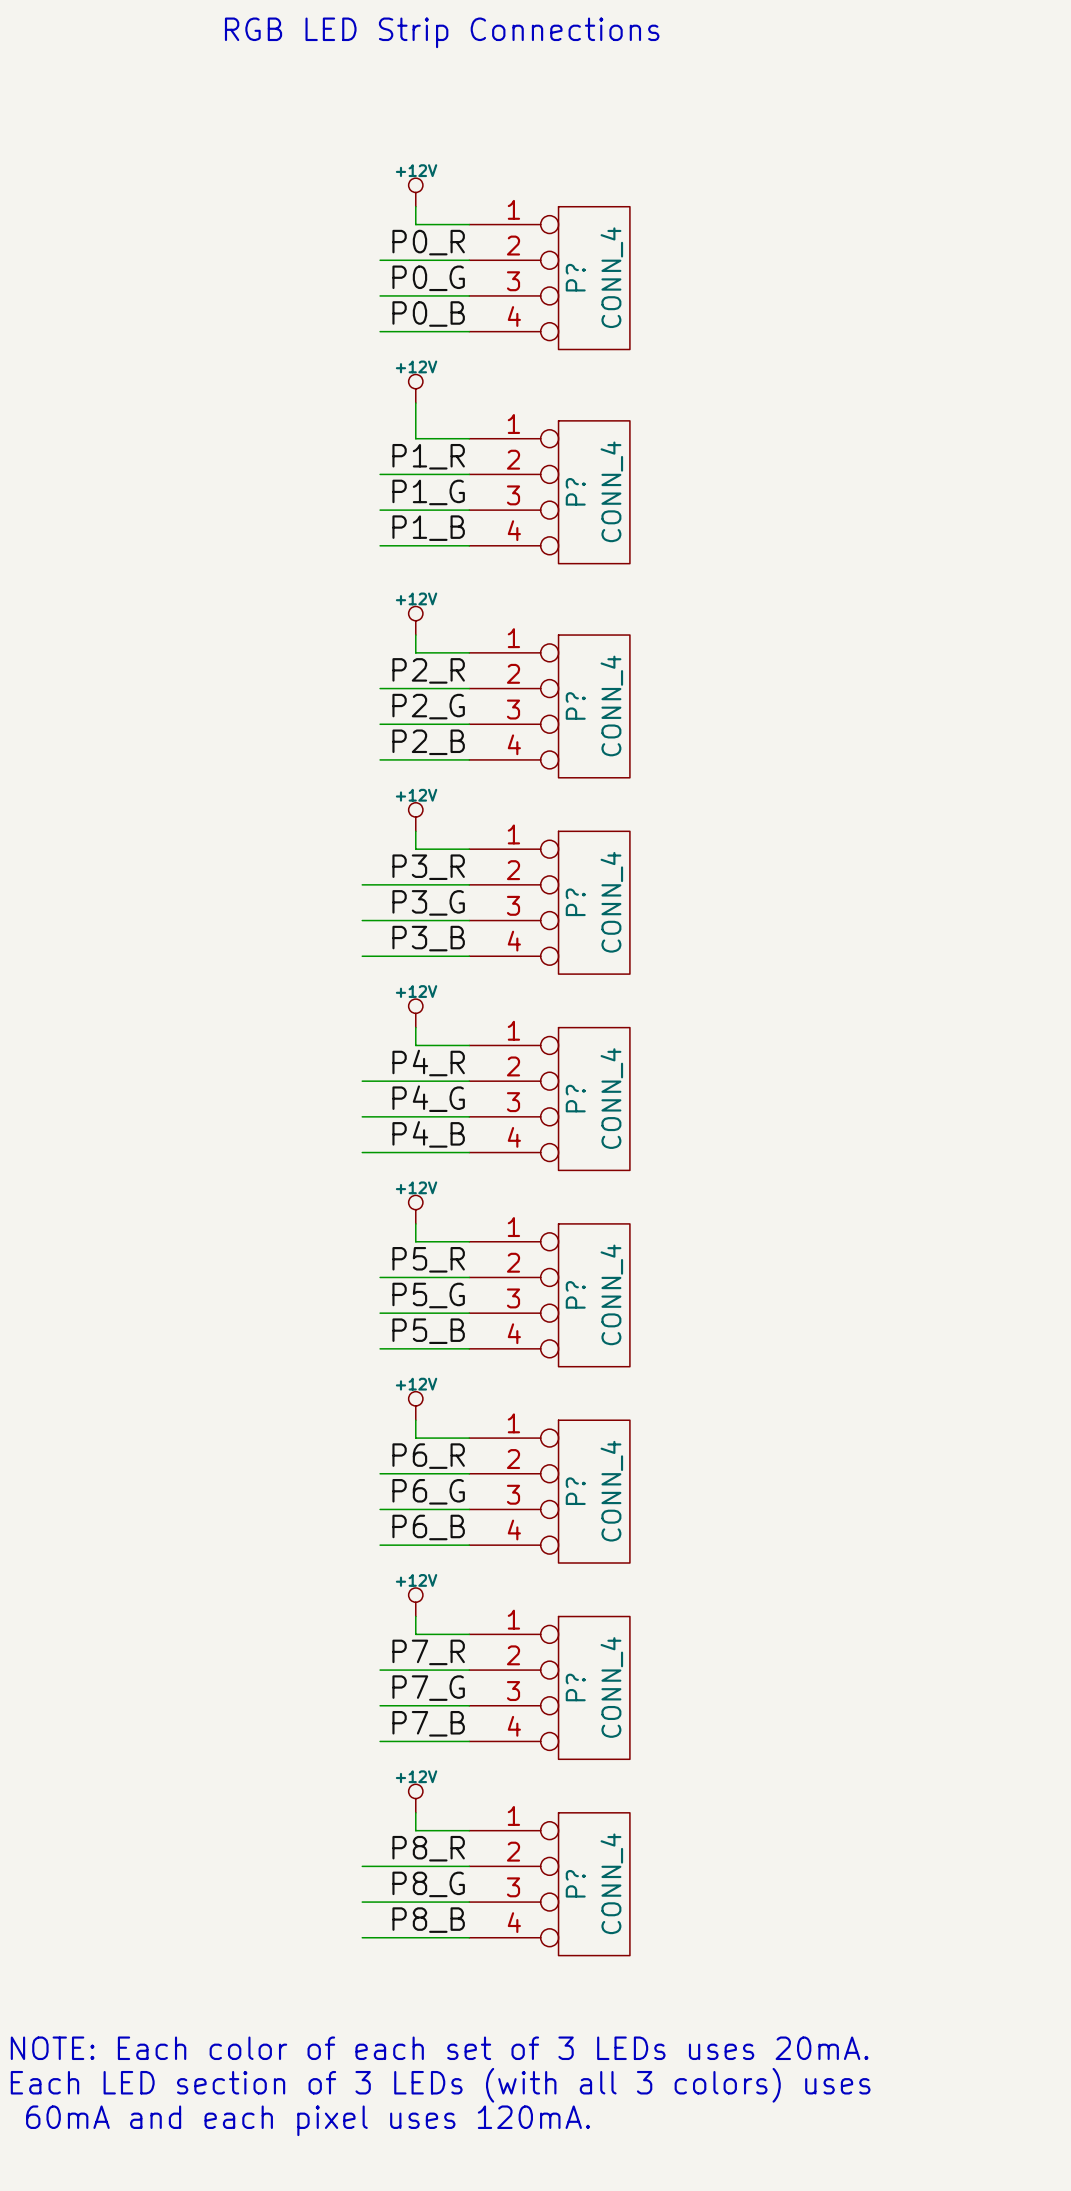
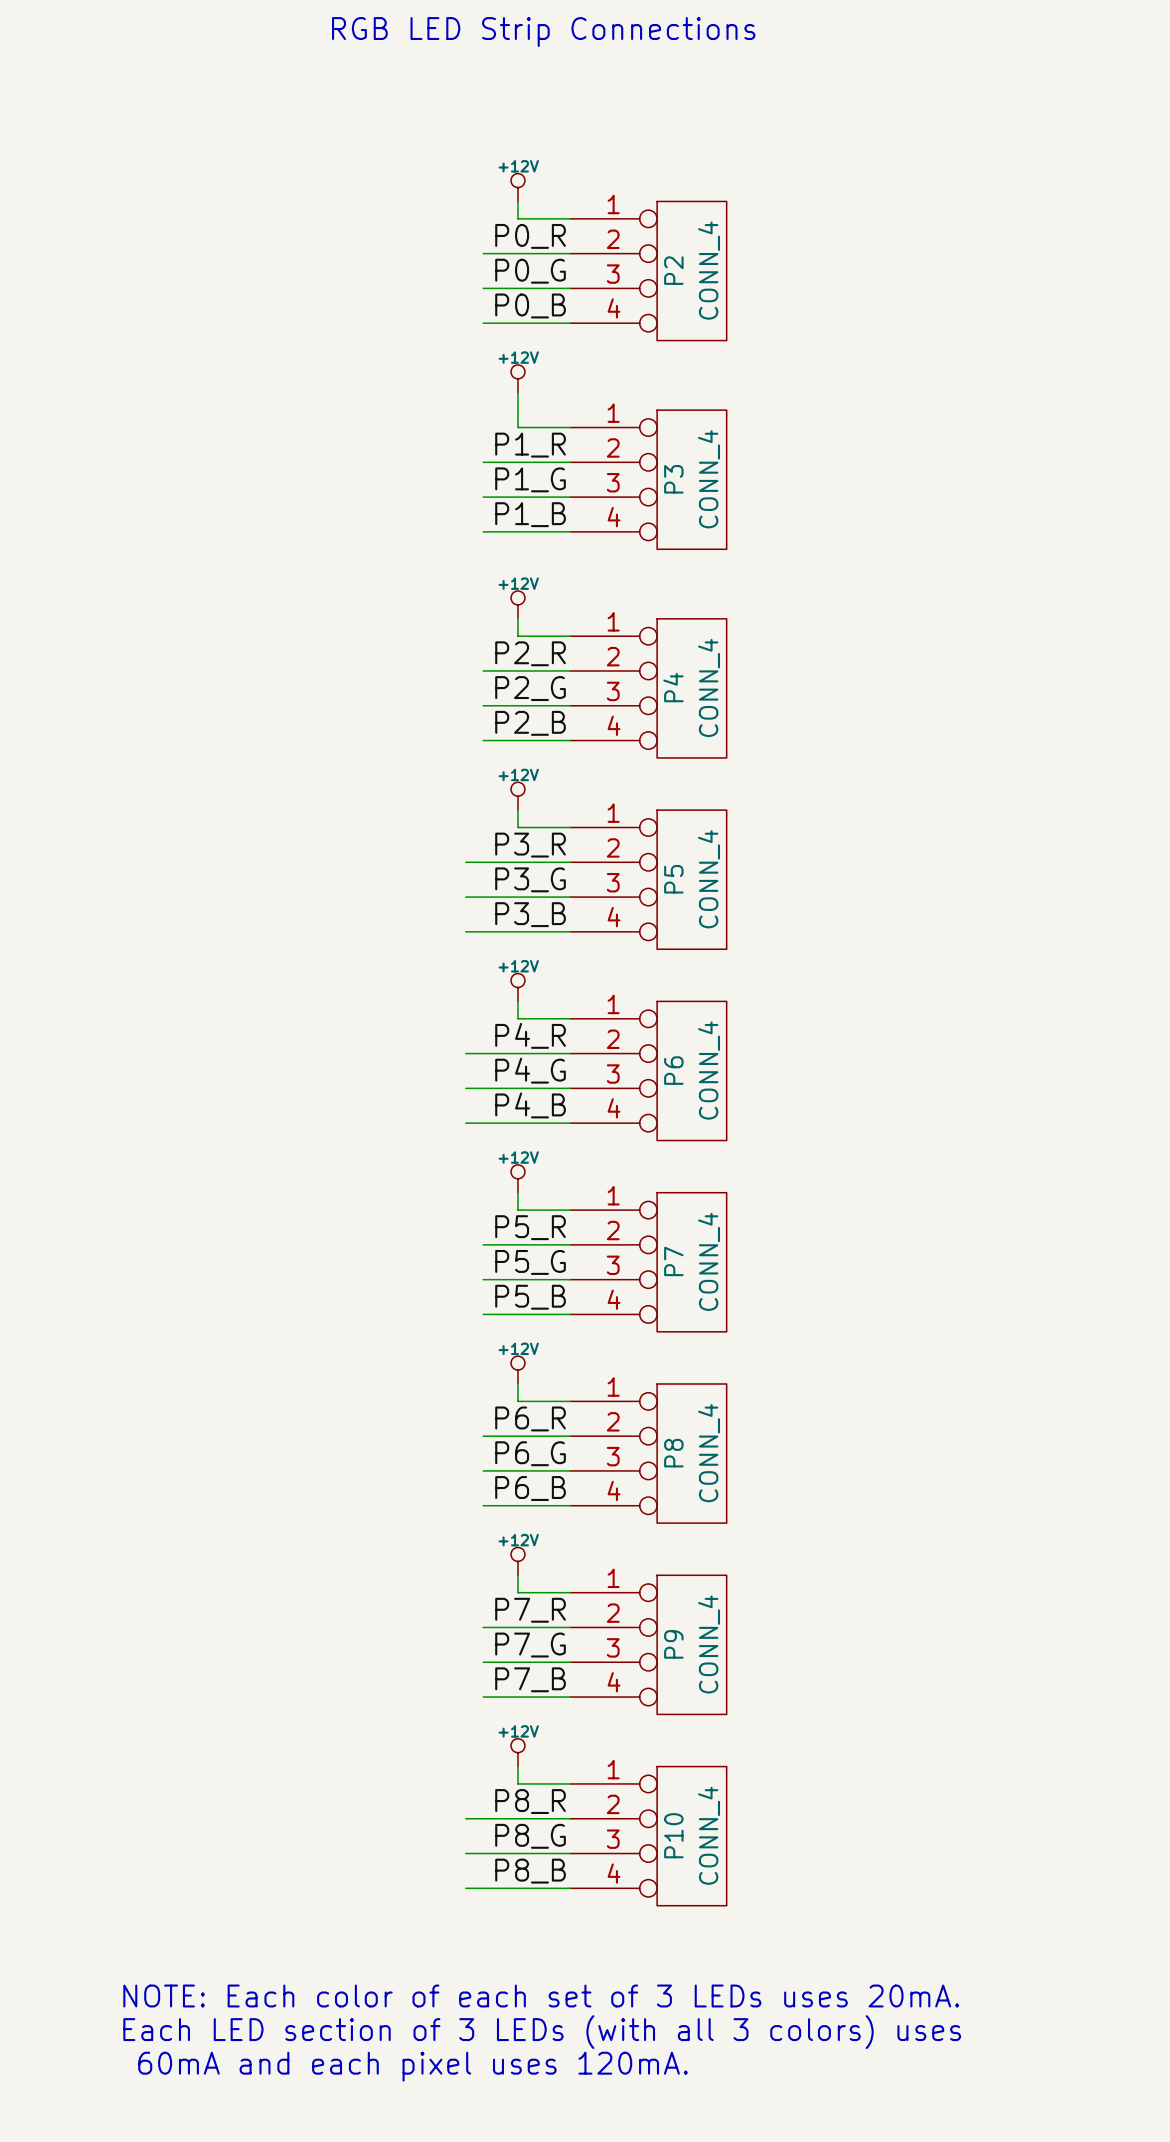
P? name: P? (575, 277) -> P2 (673, 270)
P? name: P? (575, 491) -> P3 (673, 479)
P? name: P? (575, 705) -> P4 (673, 687)
P? name: P? (575, 902) -> P5 (673, 879)
P? name: P? (575, 1098) -> P6 (673, 1070)
P? name: P? (575, 1294) -> P7 (673, 1261)
P? name: P? (575, 1491) -> P8 (673, 1453)
P? name: P? (575, 1687) -> P9 (673, 1644)
P? name: P? (575, 1883) -> P10 (673, 1835)

